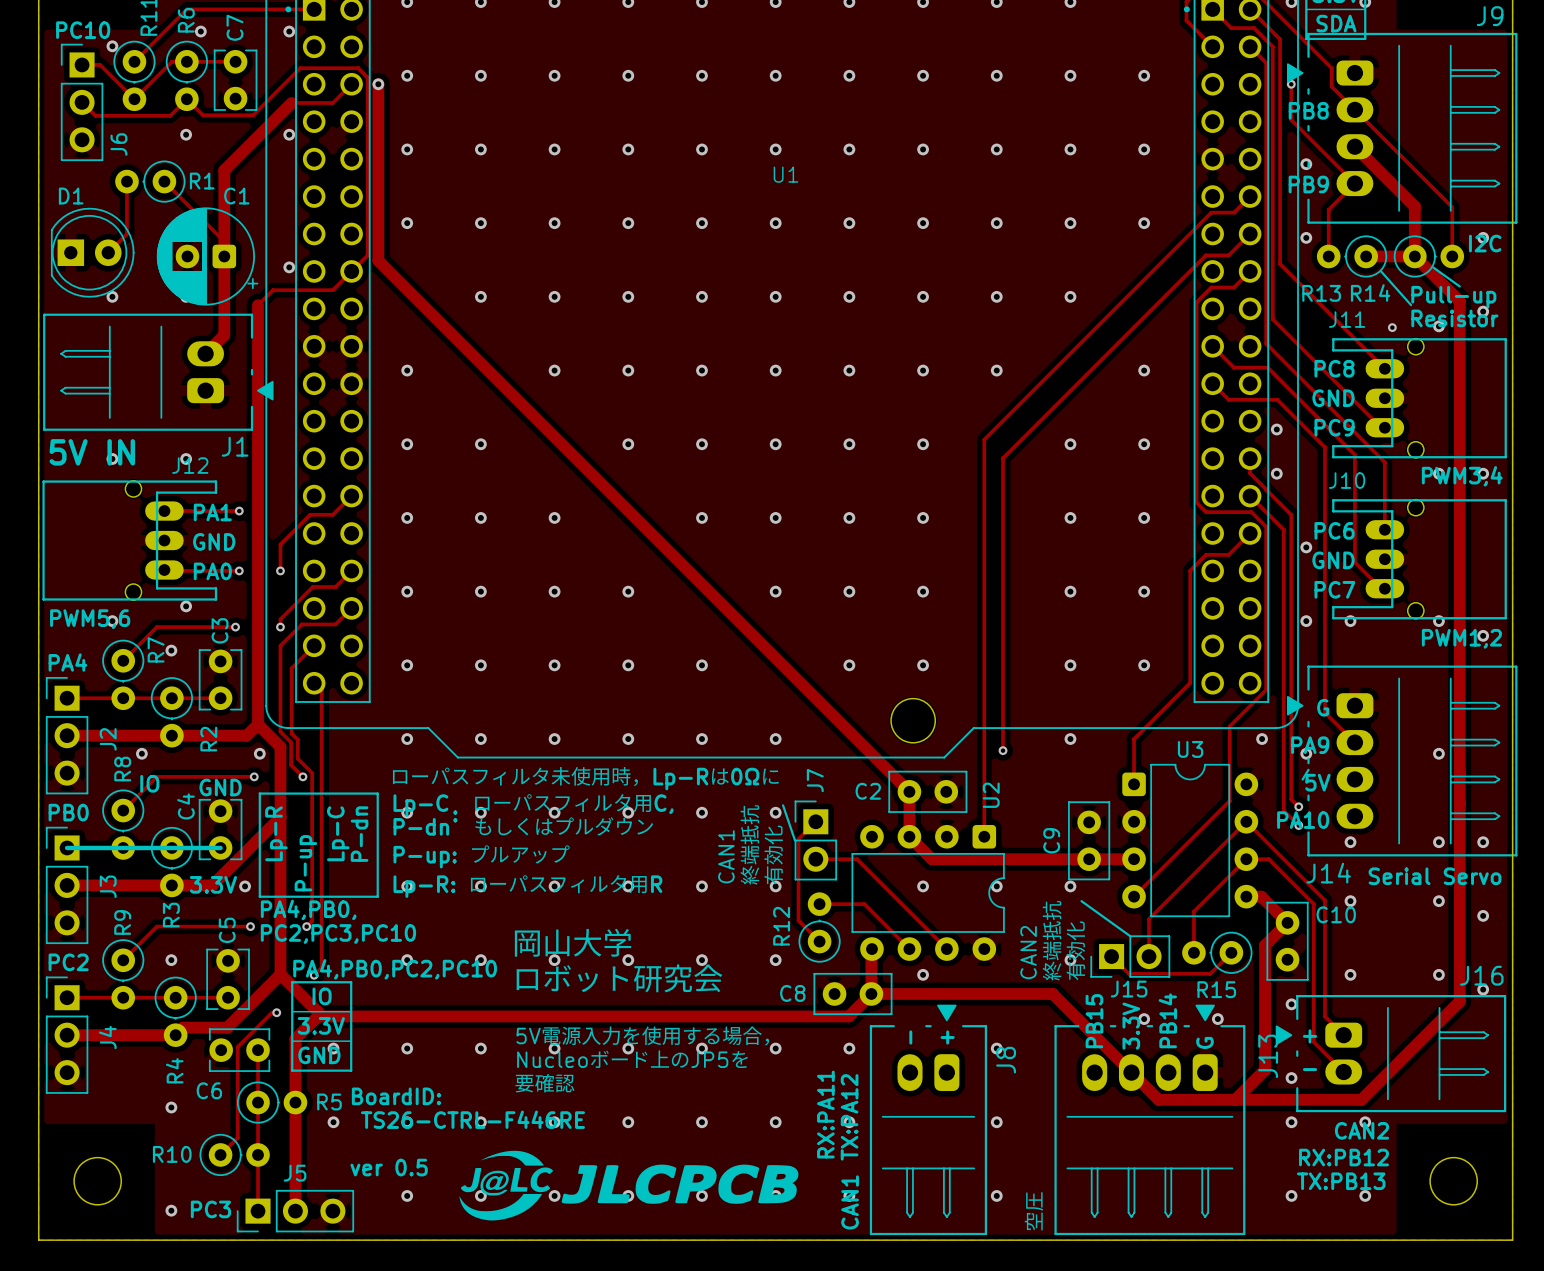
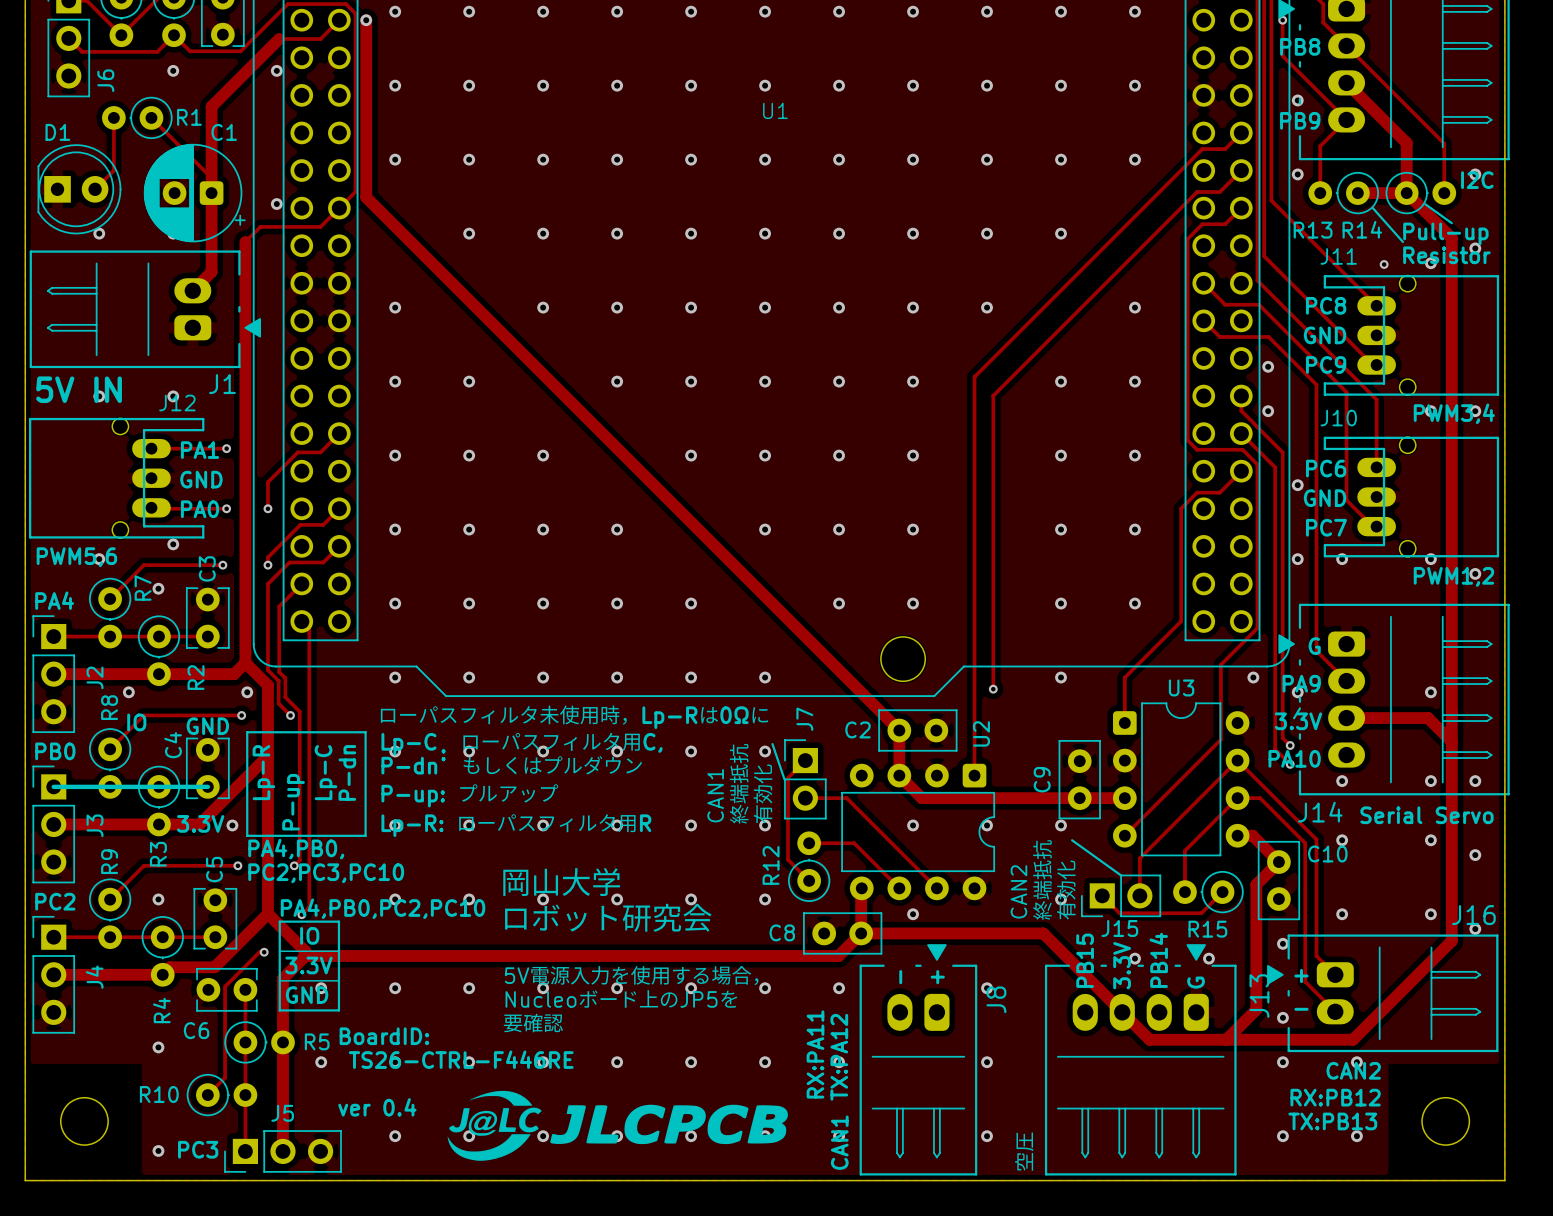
track: none -> (1346, 718) (1428, 718) (1451, 741)
text: 5V (1317, 782) -> 3.3V (1298, 721)
text: ver 0.5 (389, 1167) -> ver 0.4 (377, 1107)

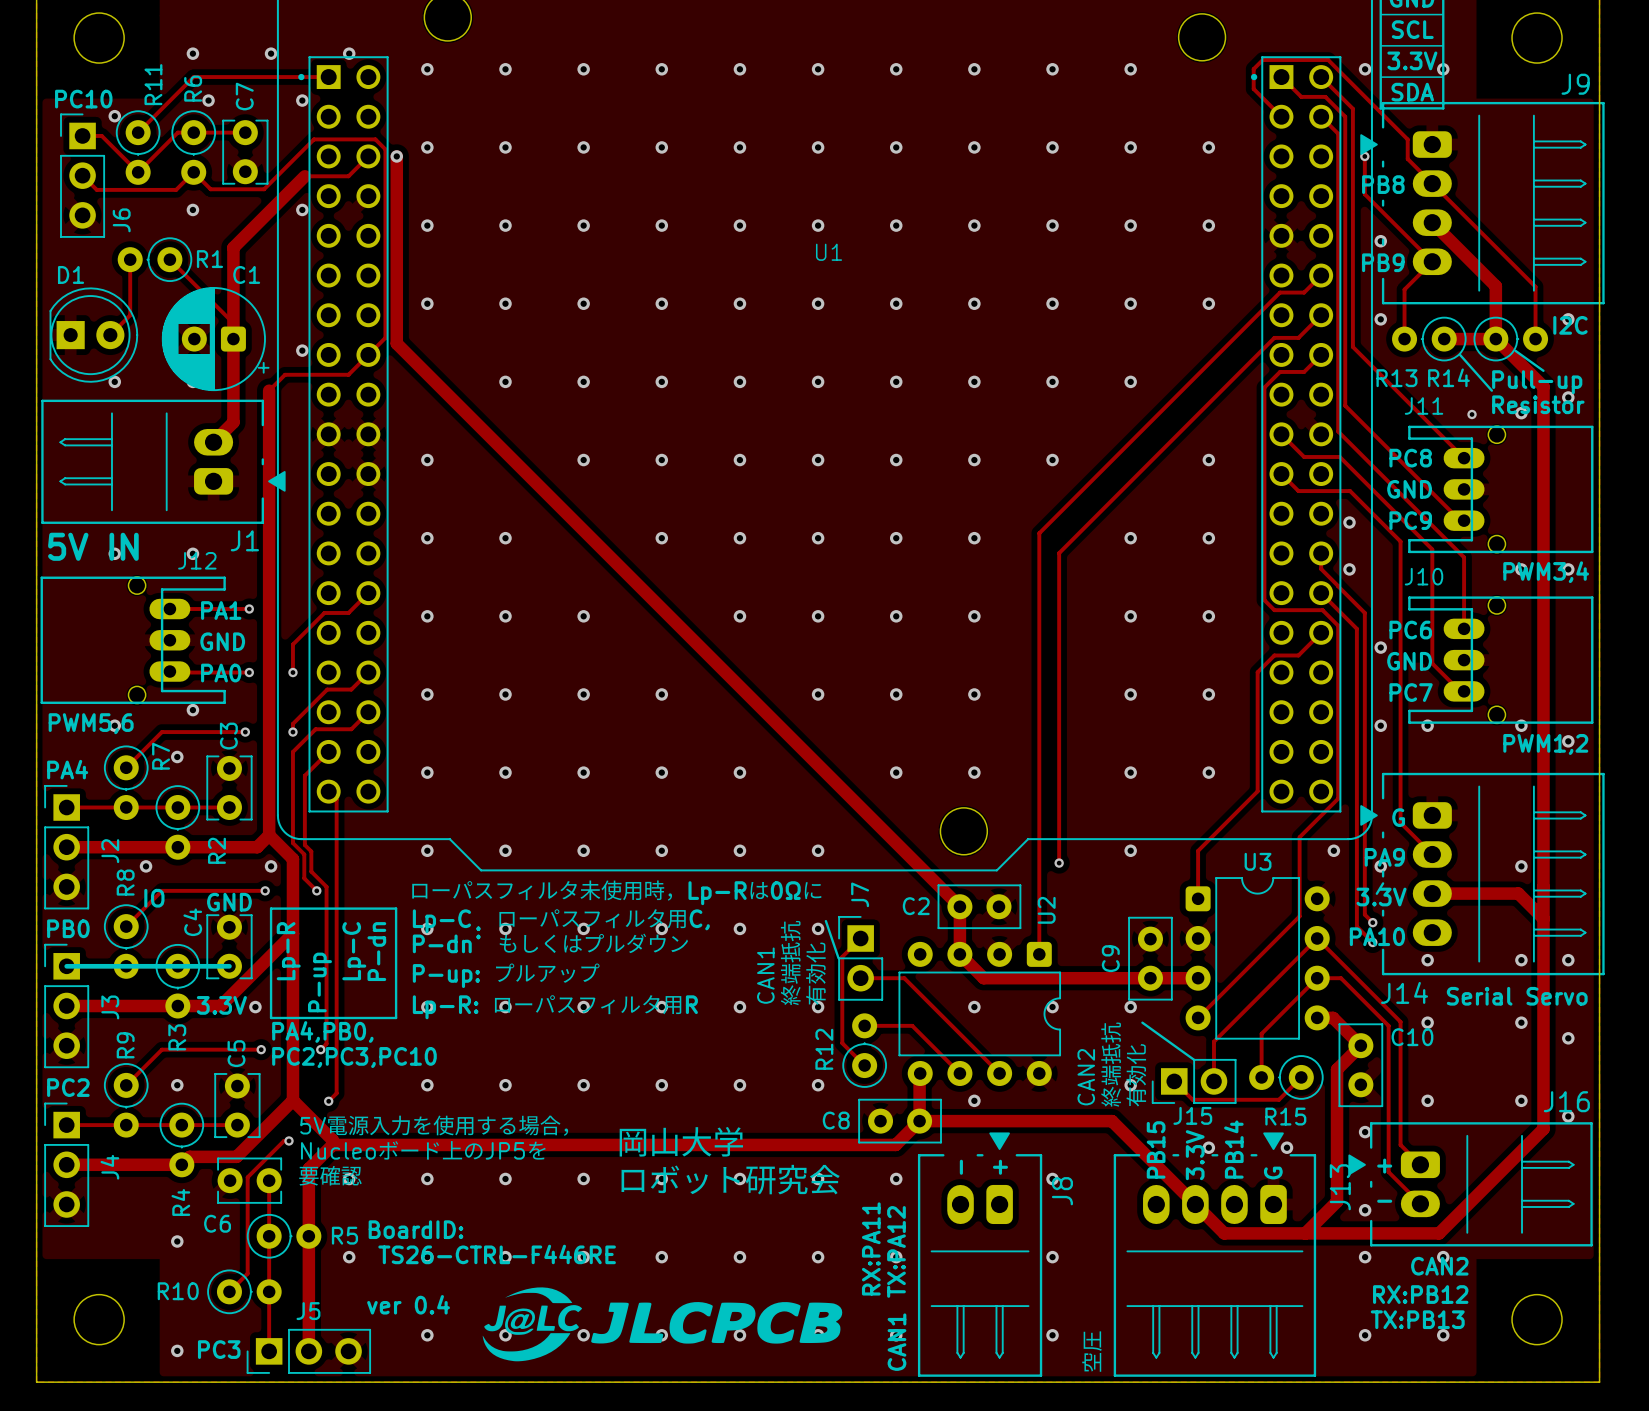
text position: 岡山大学 (561, 882) -> 岡山大学 (681, 1141)
text: PA4,PB0,PC2,PC10 (383, 908) -> none
text position: ロボット研究会 (608, 917) -> ロボット研究会 (730, 1179)
line: (279, 921) (338, 921) (338, 1010) (279, 1010) (279, 921) -> none
text: IO (309, 935) -> none
line: (279, 951) (338, 951) -> none
text: 3.3V (308, 965) -> none
text position: 5V電源入力を使用する場合， (632, 975) -> 5V電源入力を使用する場合， (434, 1125)
line: (279, 980) (338, 980) -> none
text: GND (307, 995) -> none
text position: Nucleoボード上のJP5を (621, 998) -> Nucleoボード上のJP5を (423, 1150)
text position: 要確認 (533, 1023) -> 要確認 (330, 1175)

